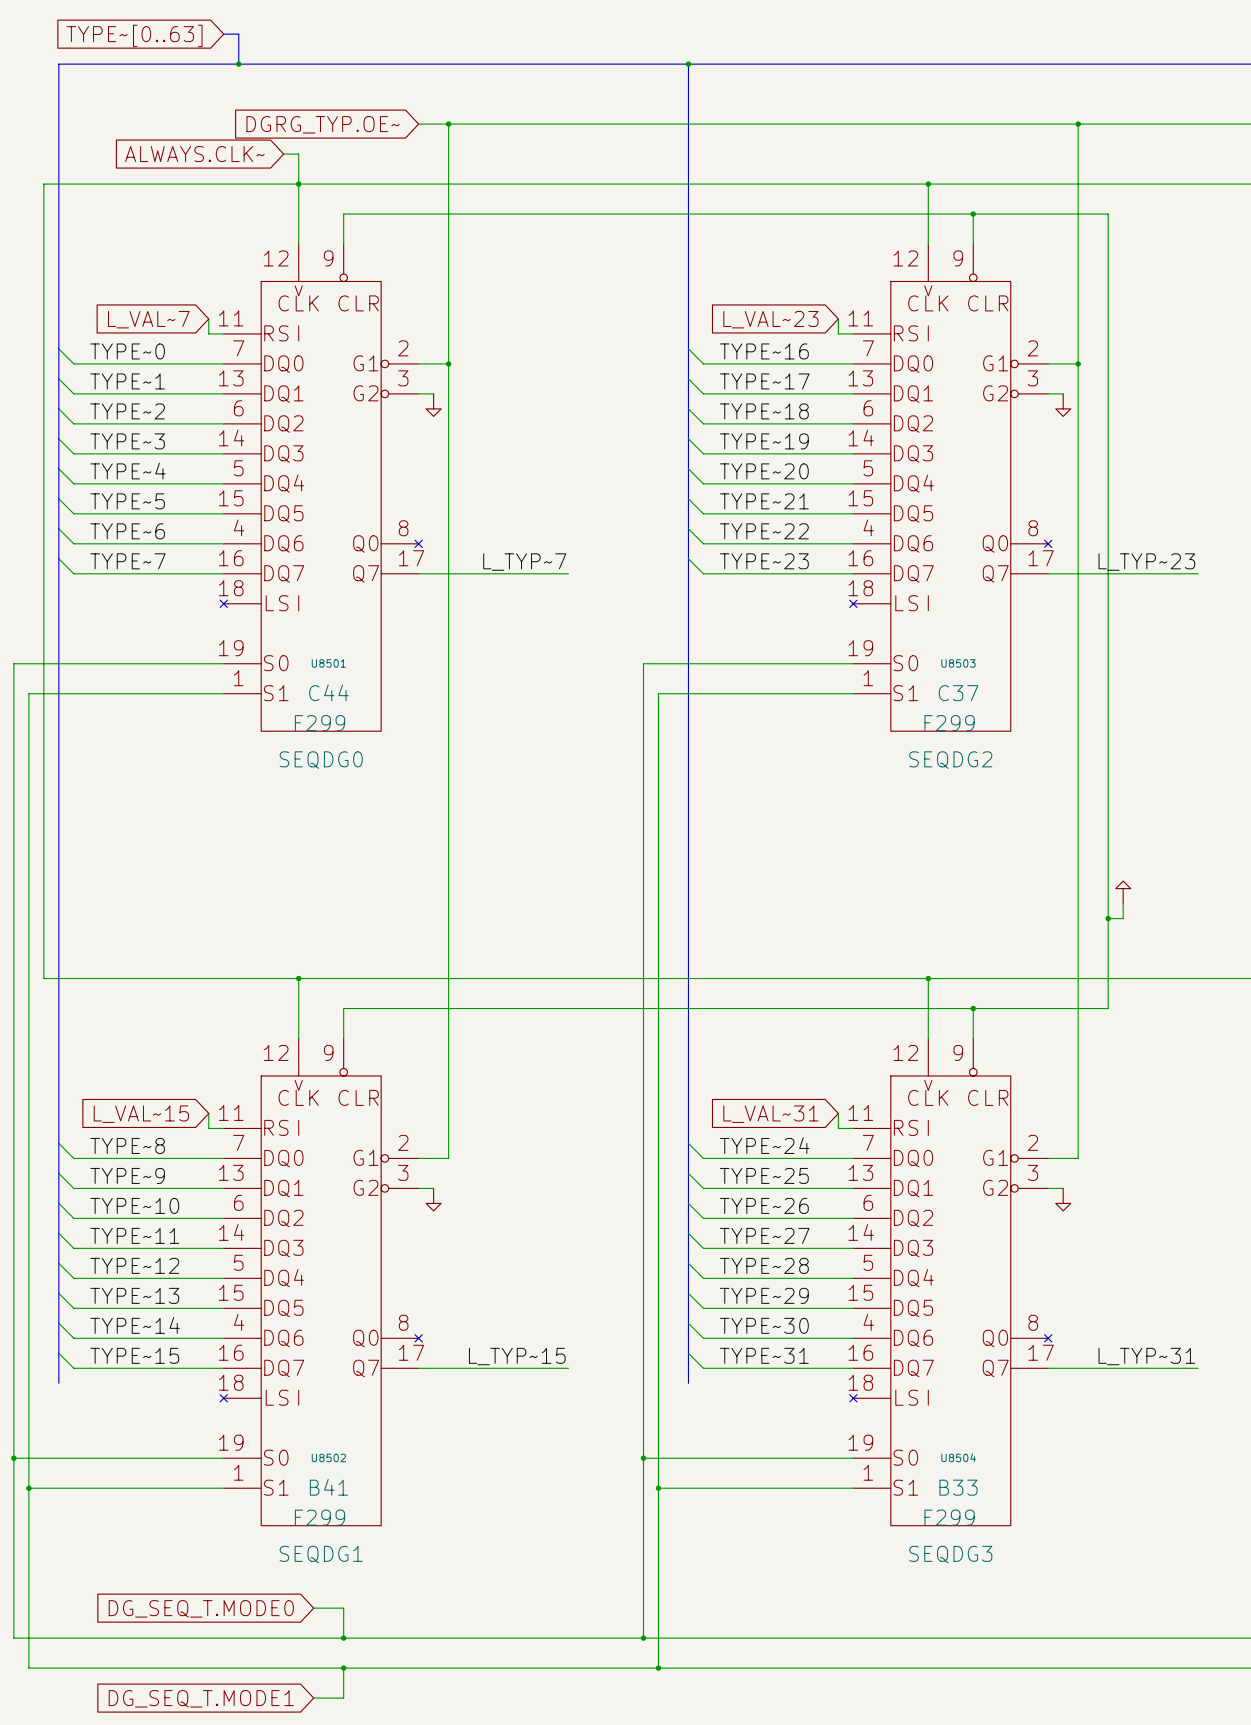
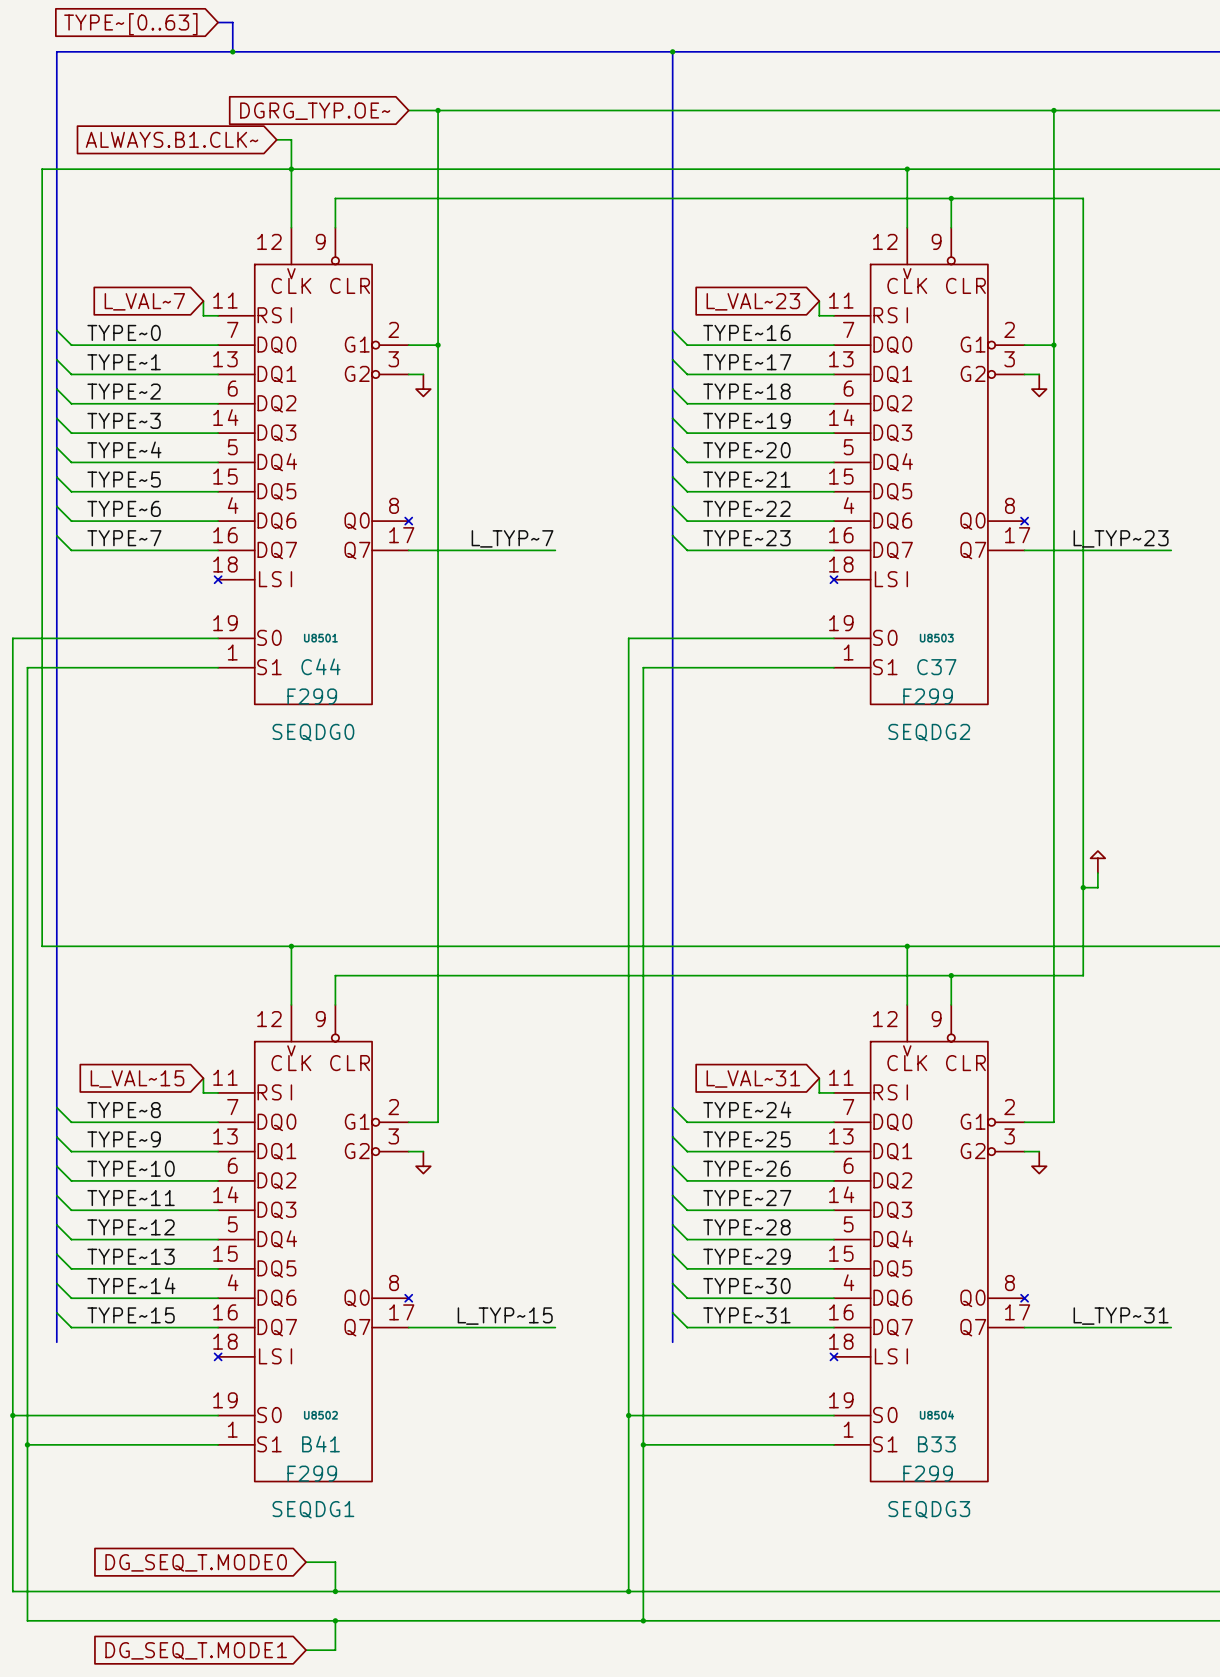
global label: ALWAYS.CLK~ (194, 154) -> ALWAYS.B1.CLK~ (172, 139)

